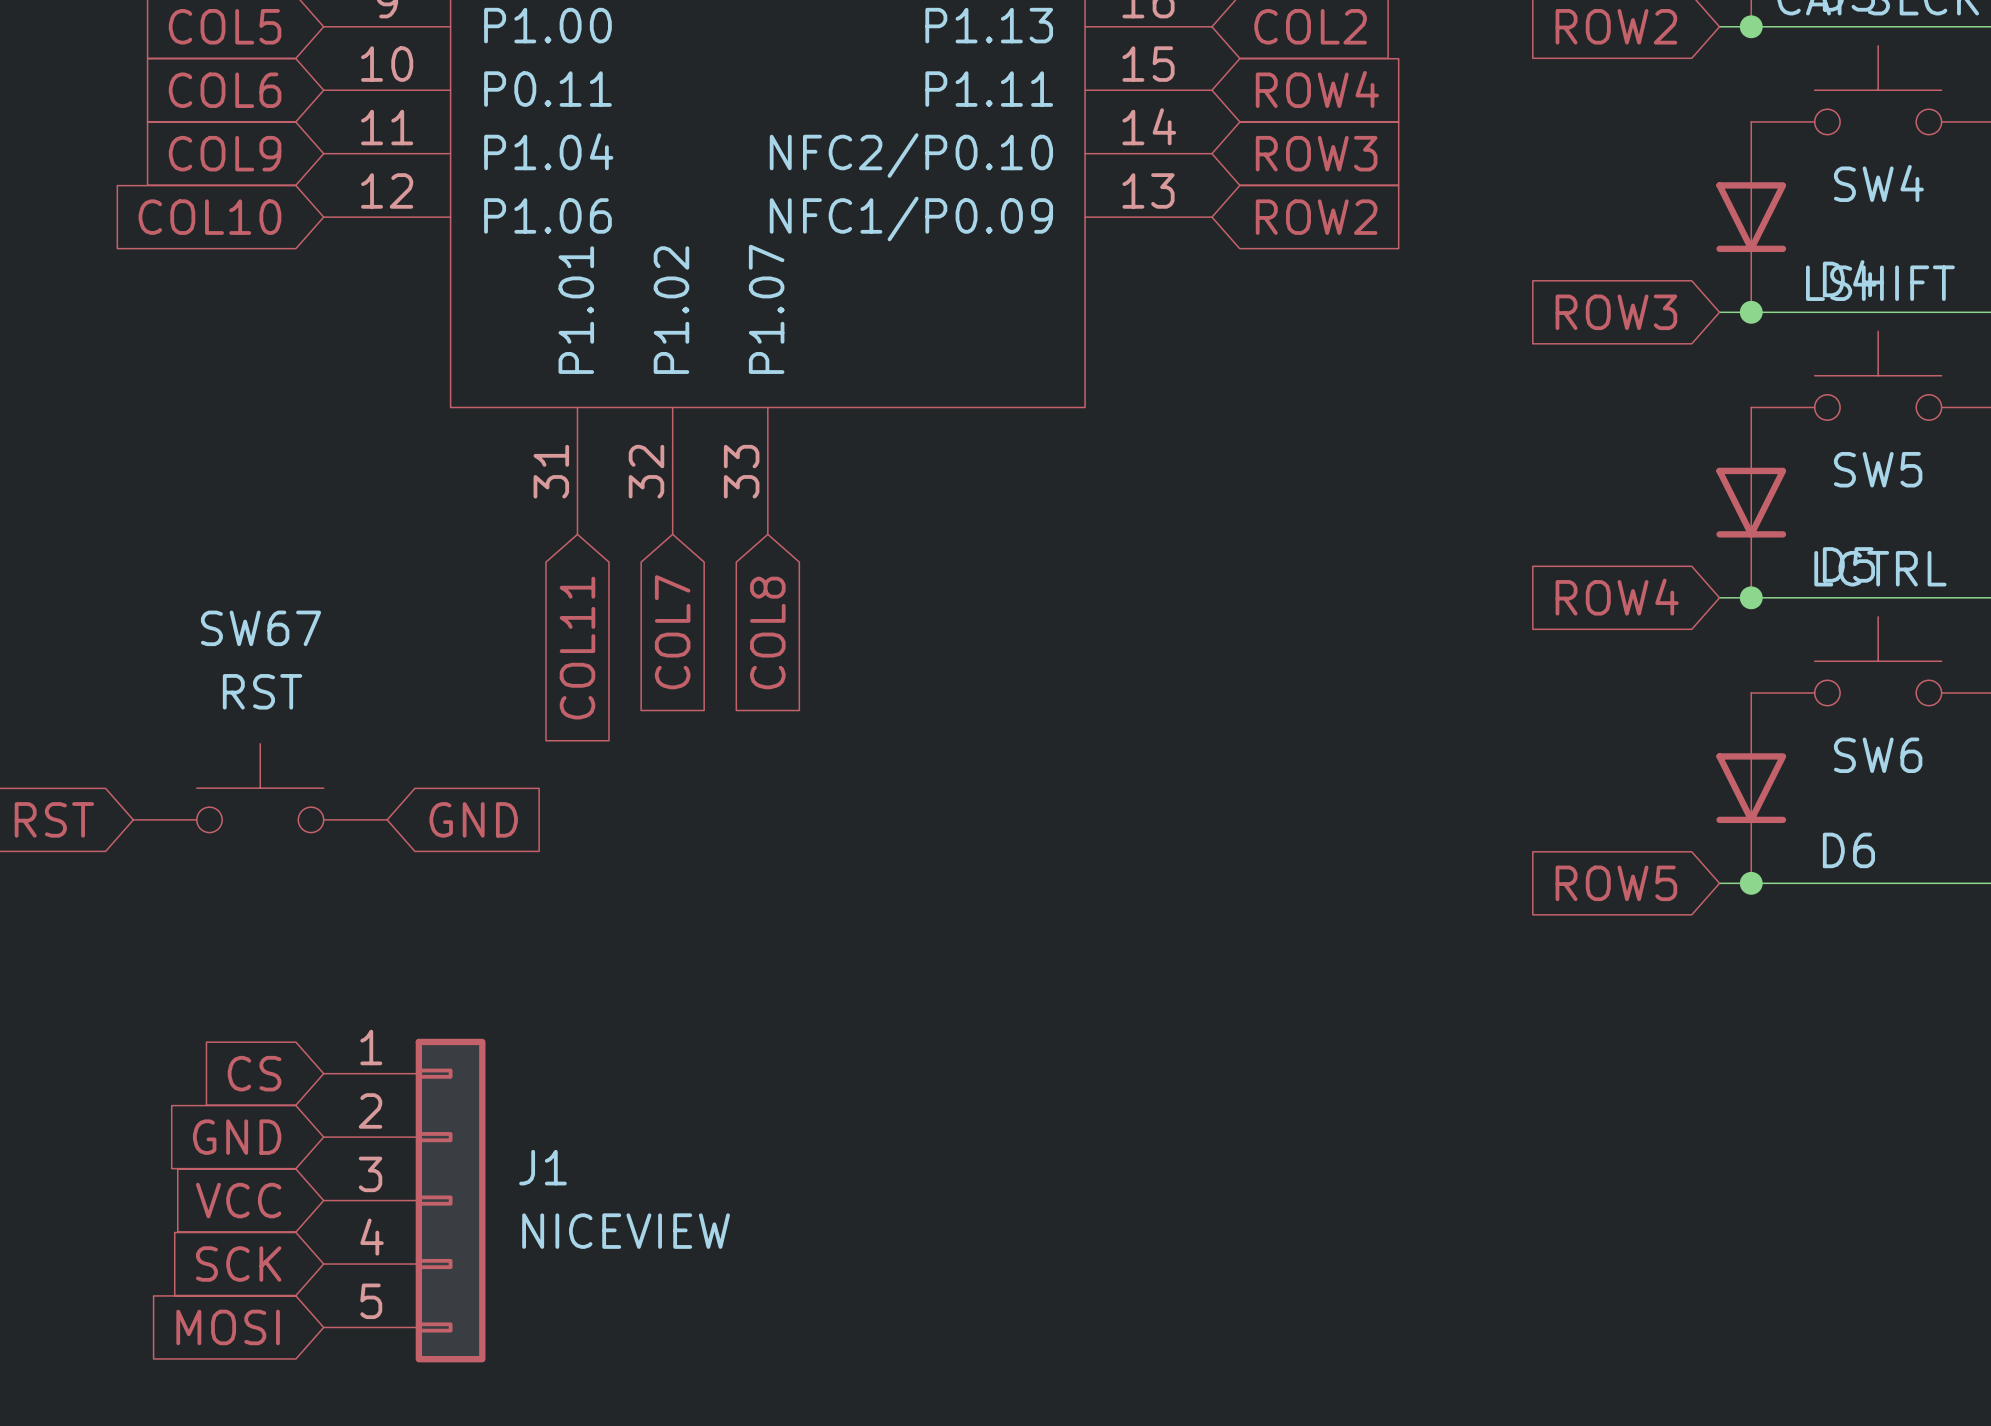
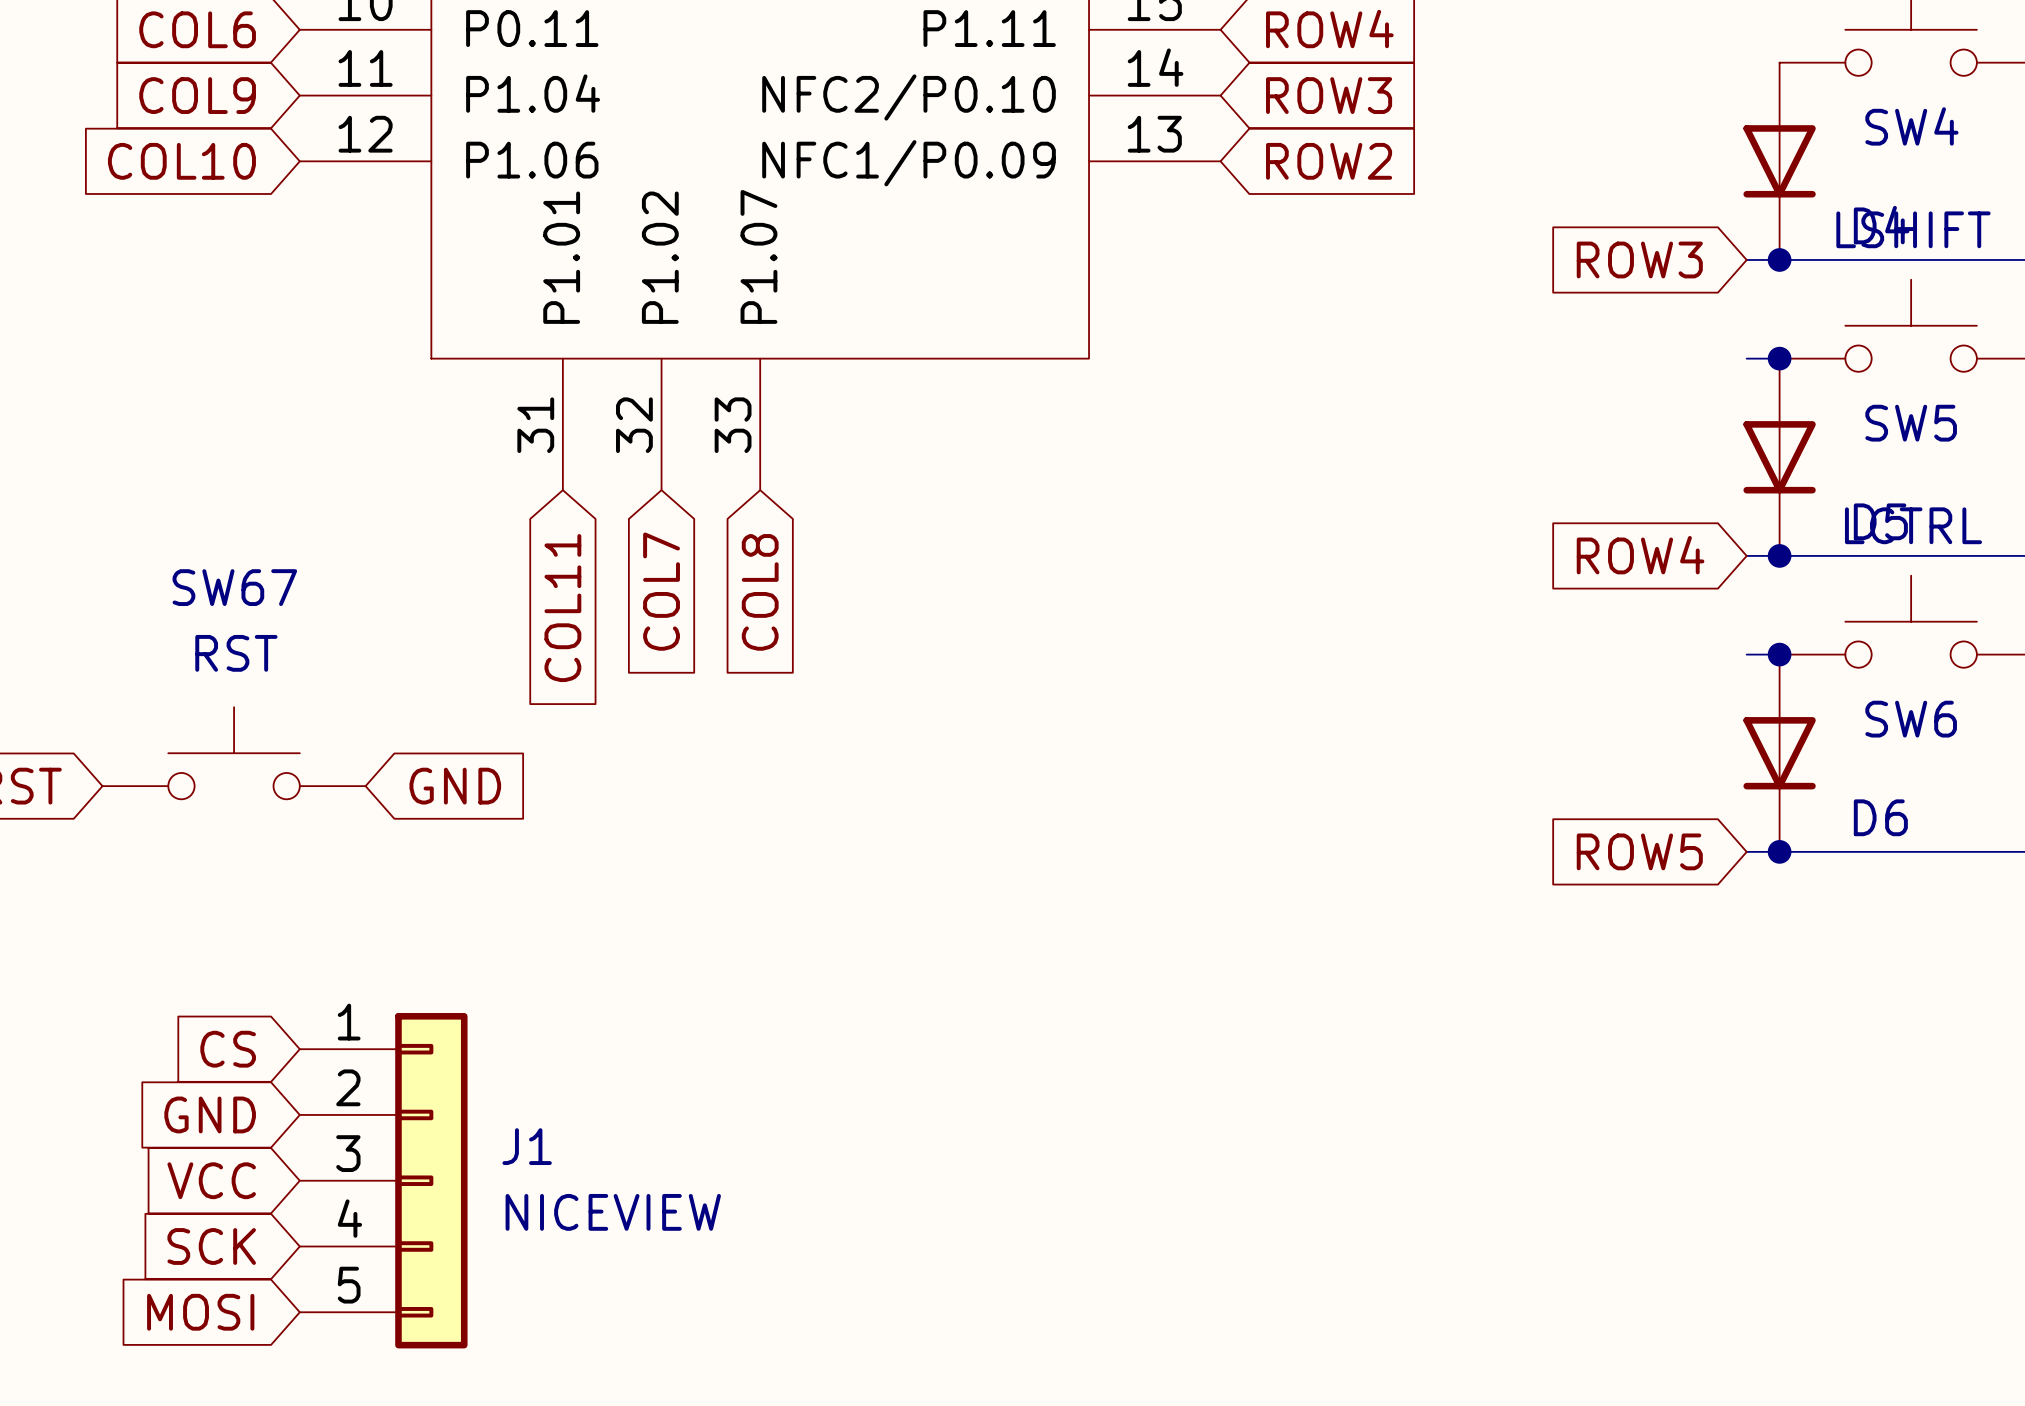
wire: none -> (1746, 358) (1779, 358)
junction: none -> (1779, 358)
wire: none -> (1746, 654) (1779, 654)
junction: none -> (1779, 654)

